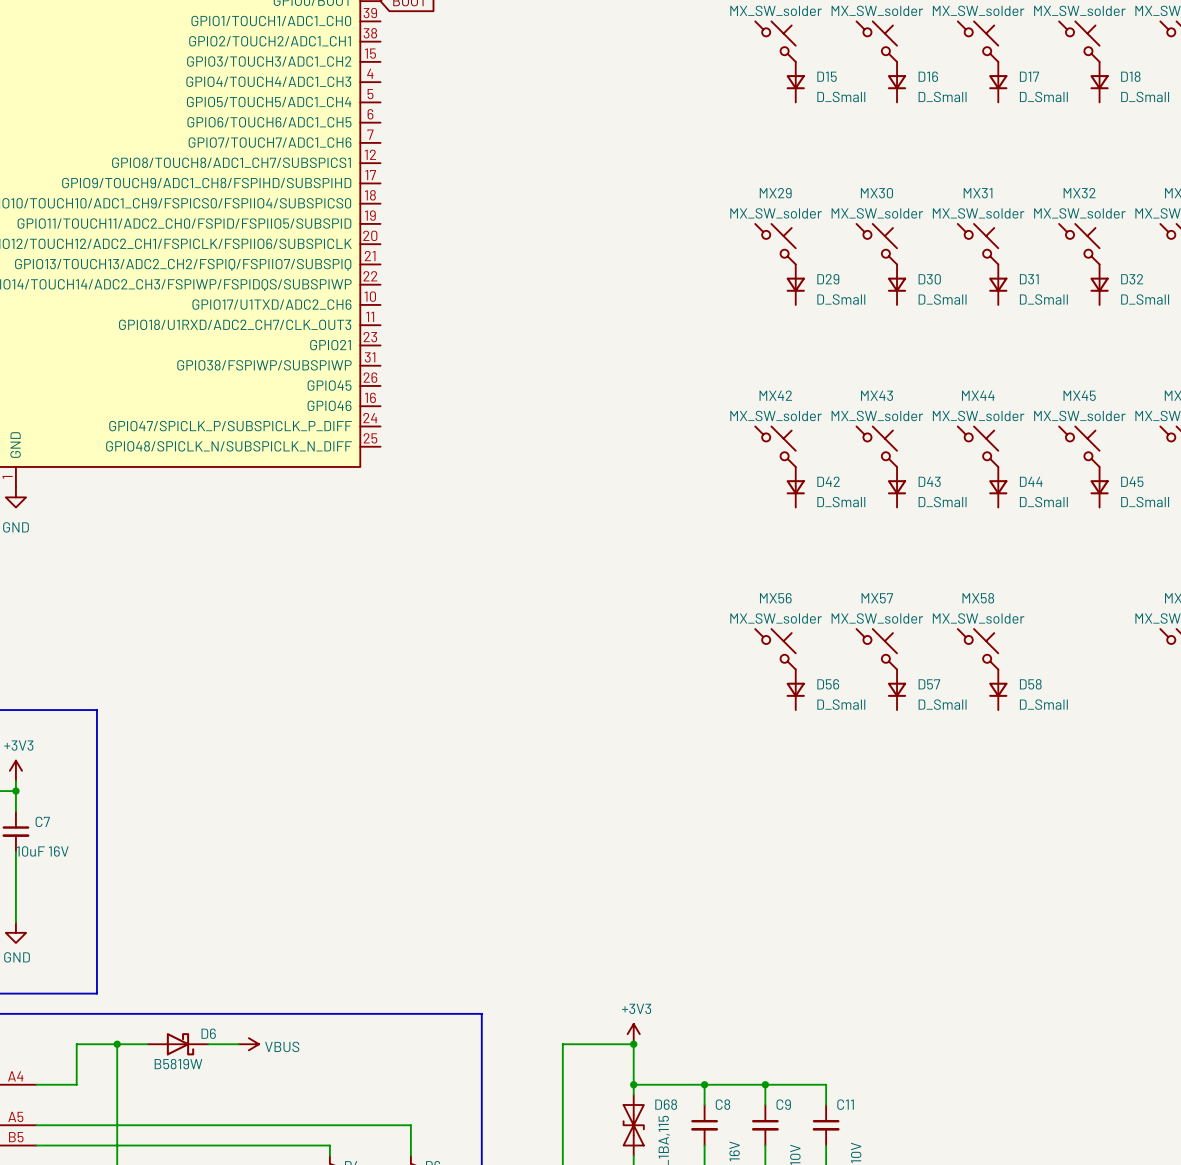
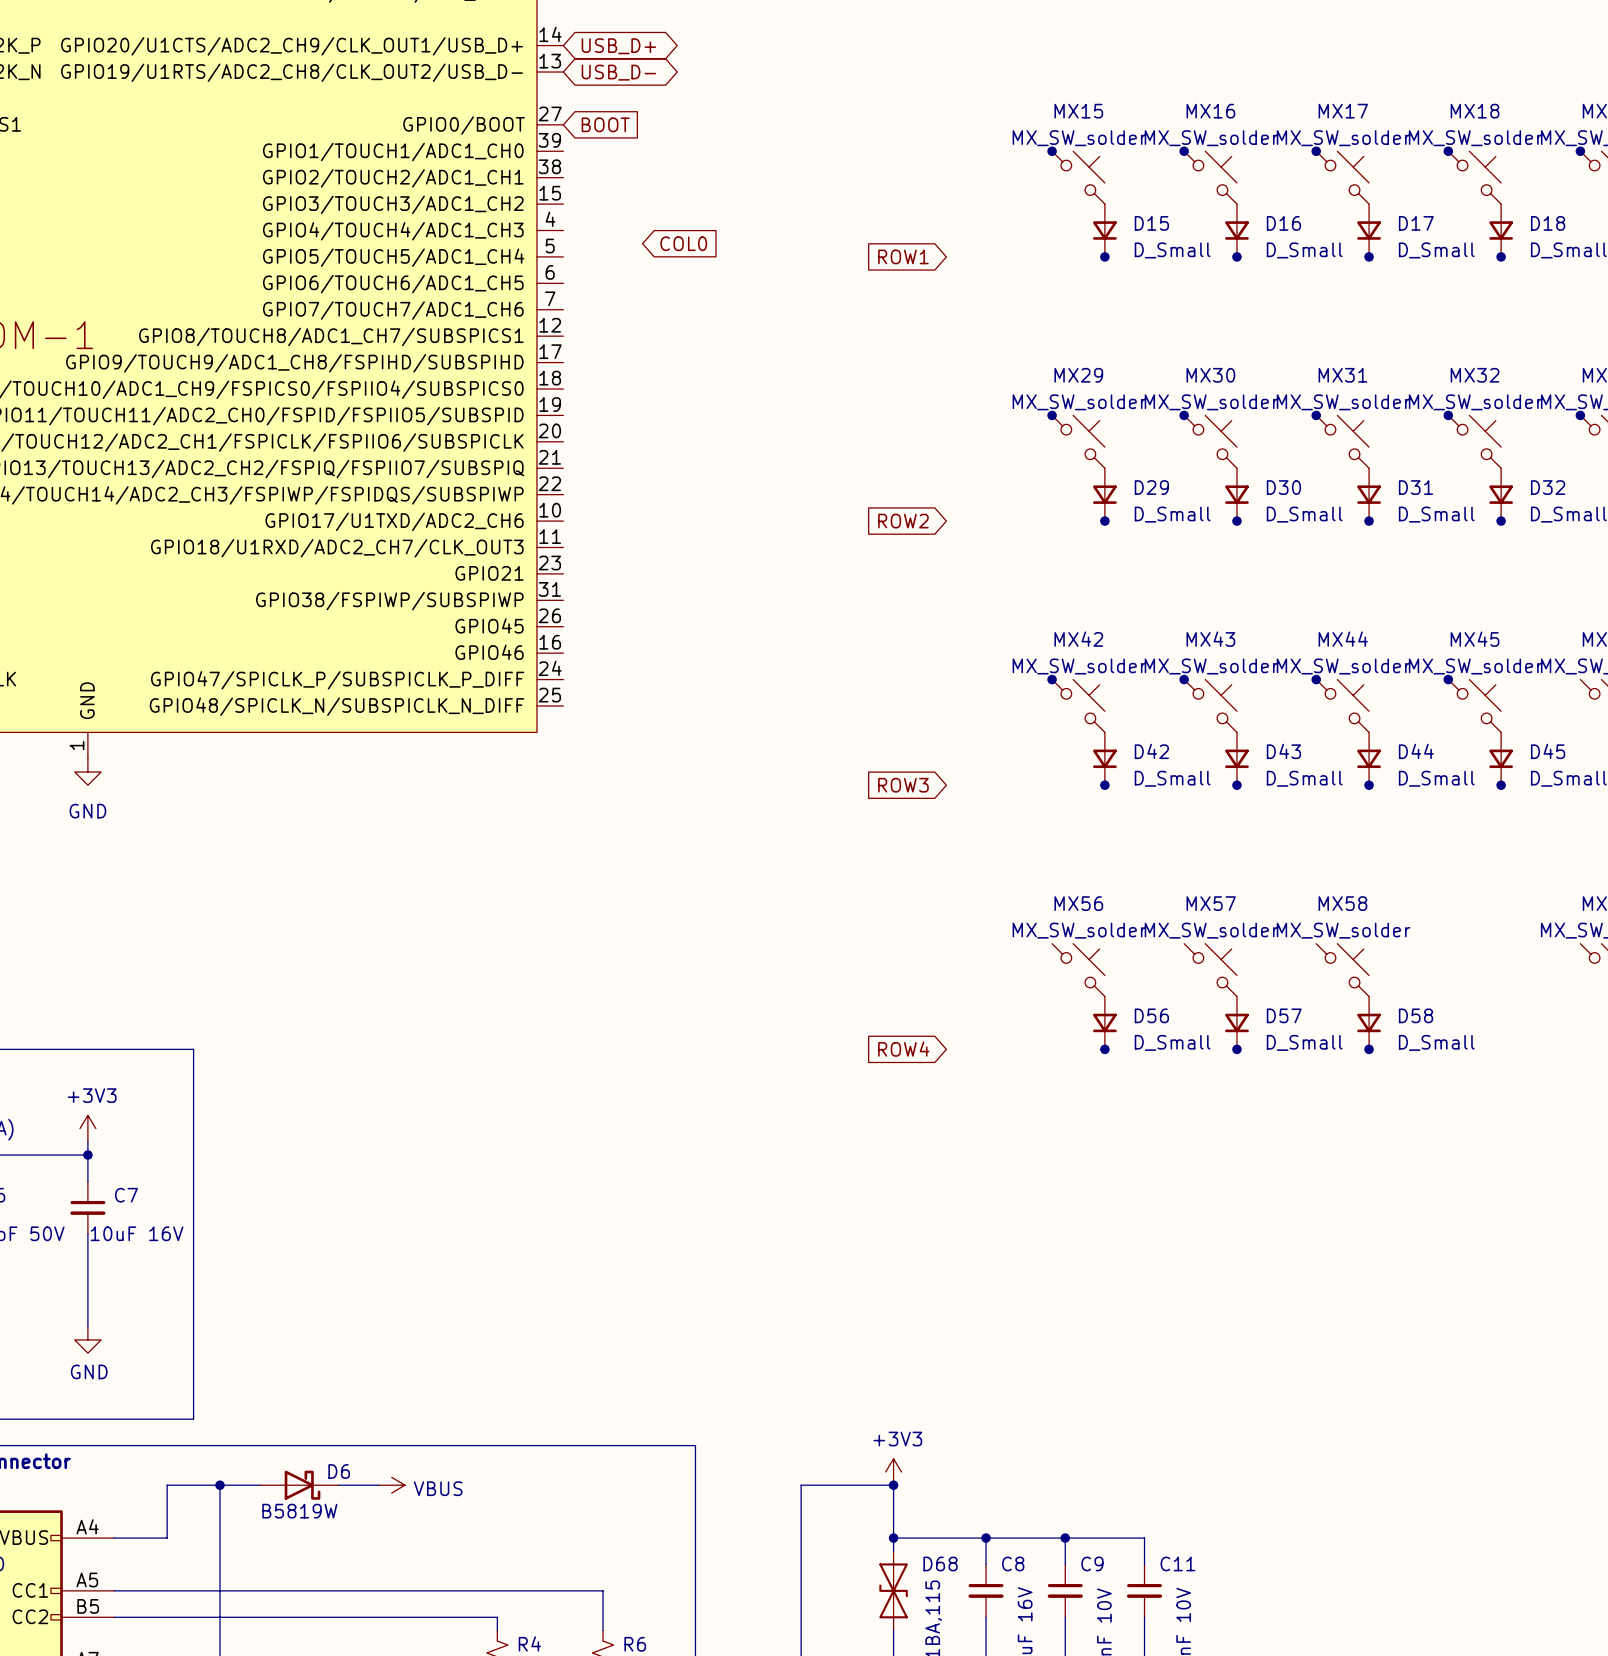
junction: none -> (1052, 151)
junction: none -> (1184, 151)
junction: none -> (1316, 151)
junction: none -> (1448, 151)
junction: none -> (1580, 151)
global label: none -> COL0 (683, 243)
global label: none -> ROW1 (903, 256)
junction: none -> (1104, 256)
junction: none -> (1236, 256)
junction: none -> (1369, 256)
junction: none -> (1501, 256)
junction: none -> (1052, 415)
junction: none -> (1184, 415)
junction: none -> (1316, 415)
junction: none -> (1448, 415)
junction: none -> (1580, 415)
global label: none -> ROW2 (903, 521)
junction: none -> (1104, 521)
junction: none -> (1236, 521)
junction: none -> (1369, 521)
junction: none -> (1501, 521)
junction: none -> (1052, 679)
junction: none -> (1184, 679)
junction: none -> (1316, 679)
junction: none -> (1448, 679)
global label: none -> ROW3 (903, 785)
junction: none -> (1104, 785)
junction: none -> (1236, 785)
junction: none -> (1369, 785)
junction: none -> (1501, 785)
global label: none -> ROW4 (903, 1049)
junction: none -> (1104, 1049)
junction: none -> (1236, 1049)
junction: none -> (1369, 1049)

